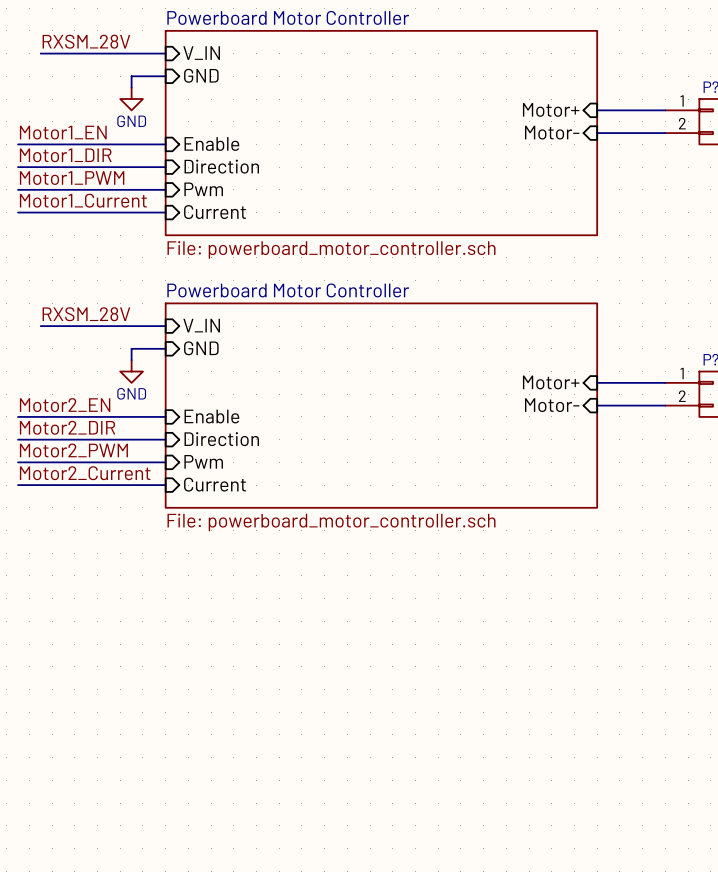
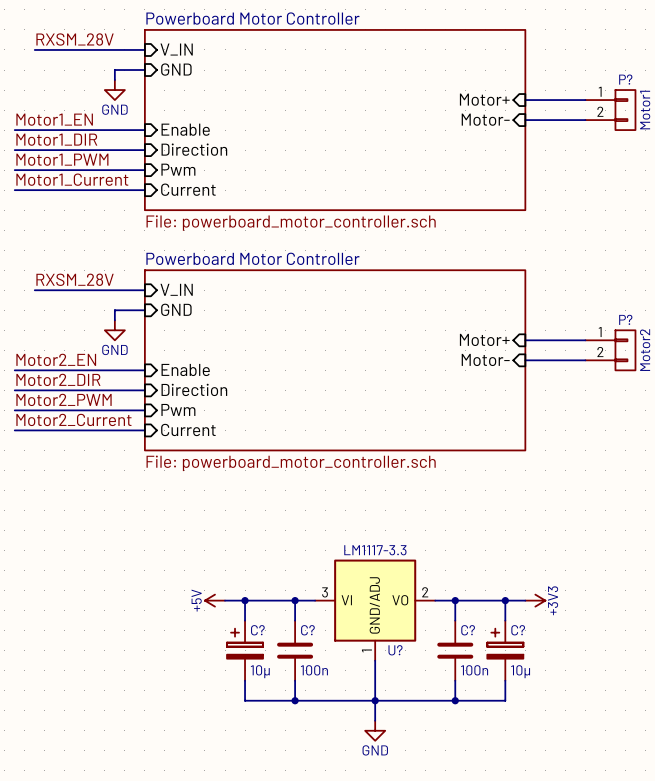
power symbol: none -> +5V (214, 600)
wire: none -> (225, 600) (315, 600)
wire: none -> (245, 600) (245, 620)
junction: none -> (245, 600)
wire: none -> (295, 600) (295, 620)
junction: none -> (295, 600)
wire: none -> (435, 600) (525, 600)
wire: none -> (455, 600) (455, 620)
junction: none -> (455, 600)
wire: none -> (505, 600) (505, 620)
junction: none -> (505, 600)
power symbol: none -> +3V3 (535, 600)
U?: none -> LM1117-3.3 (375, 610)
C?: none -> 10µ (245, 650)
C?: none -> 100n (295, 650)
C?: none -> 100n (455, 650)
C?: none -> 10µ (505, 650)
wire: none -> (375, 660) (375, 720)
wire: none -> (245, 680) (245, 700) (505, 700) (505, 680)
wire: none -> (295, 680) (295, 700)
wire: none -> (455, 680) (455, 700)
junction: none -> (295, 700)
junction: none -> (375, 700)
junction: none -> (455, 700)
power symbol: none -> GND (375, 730)

